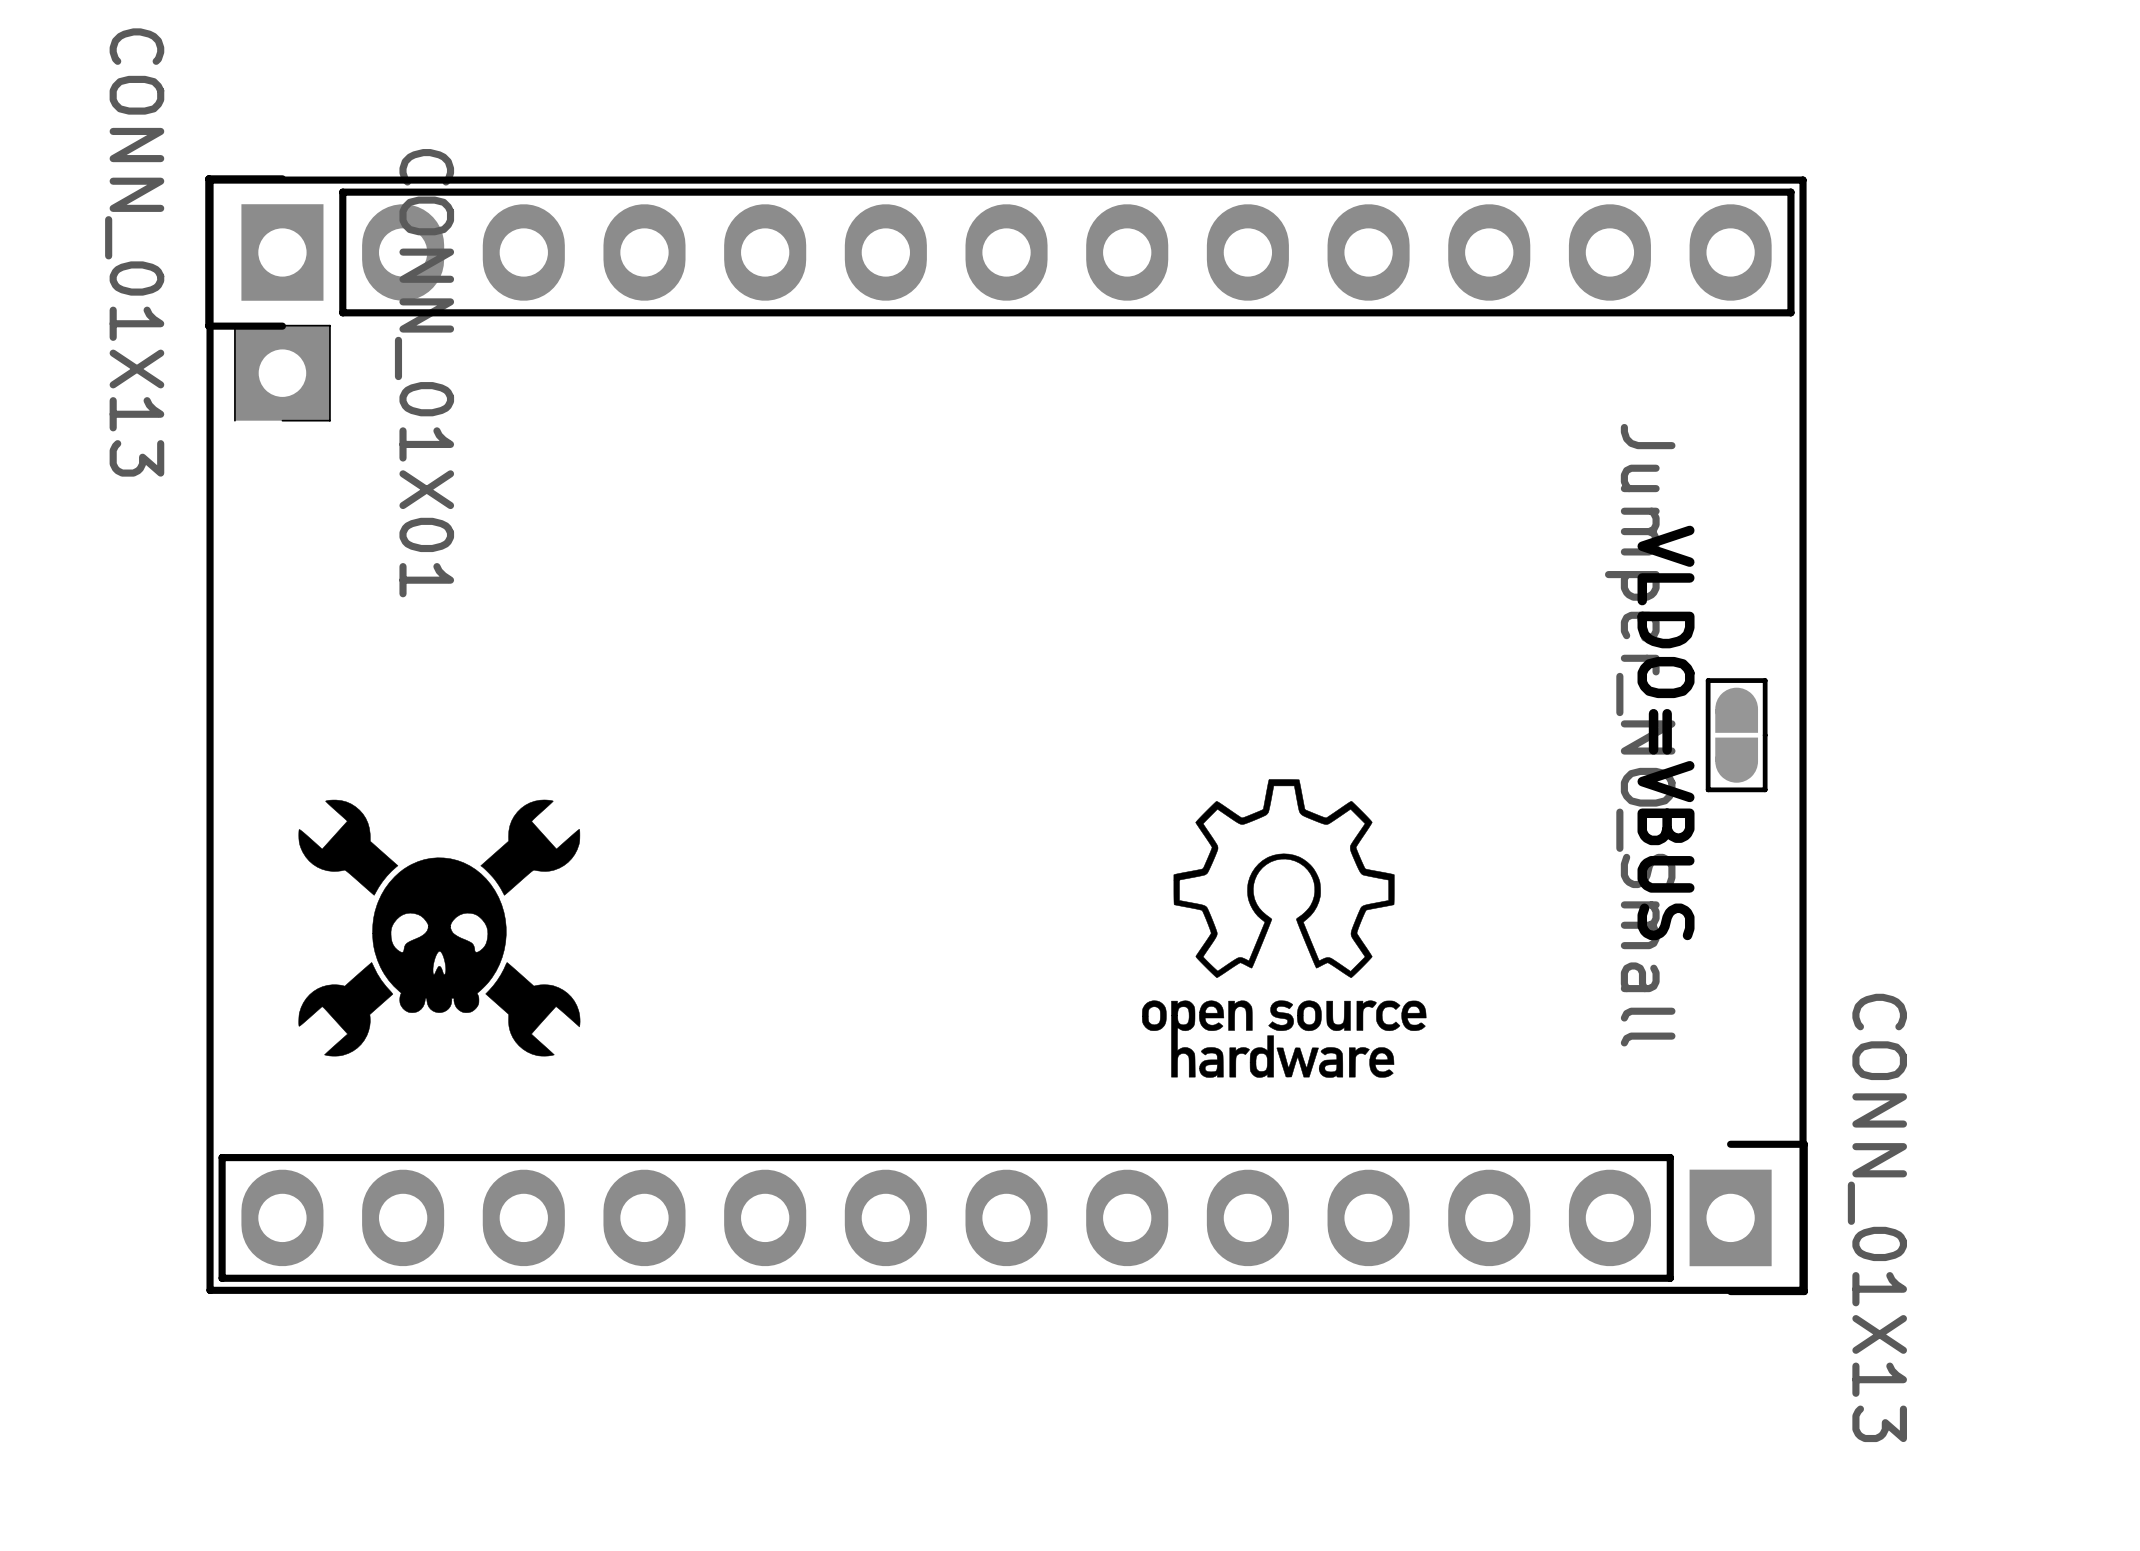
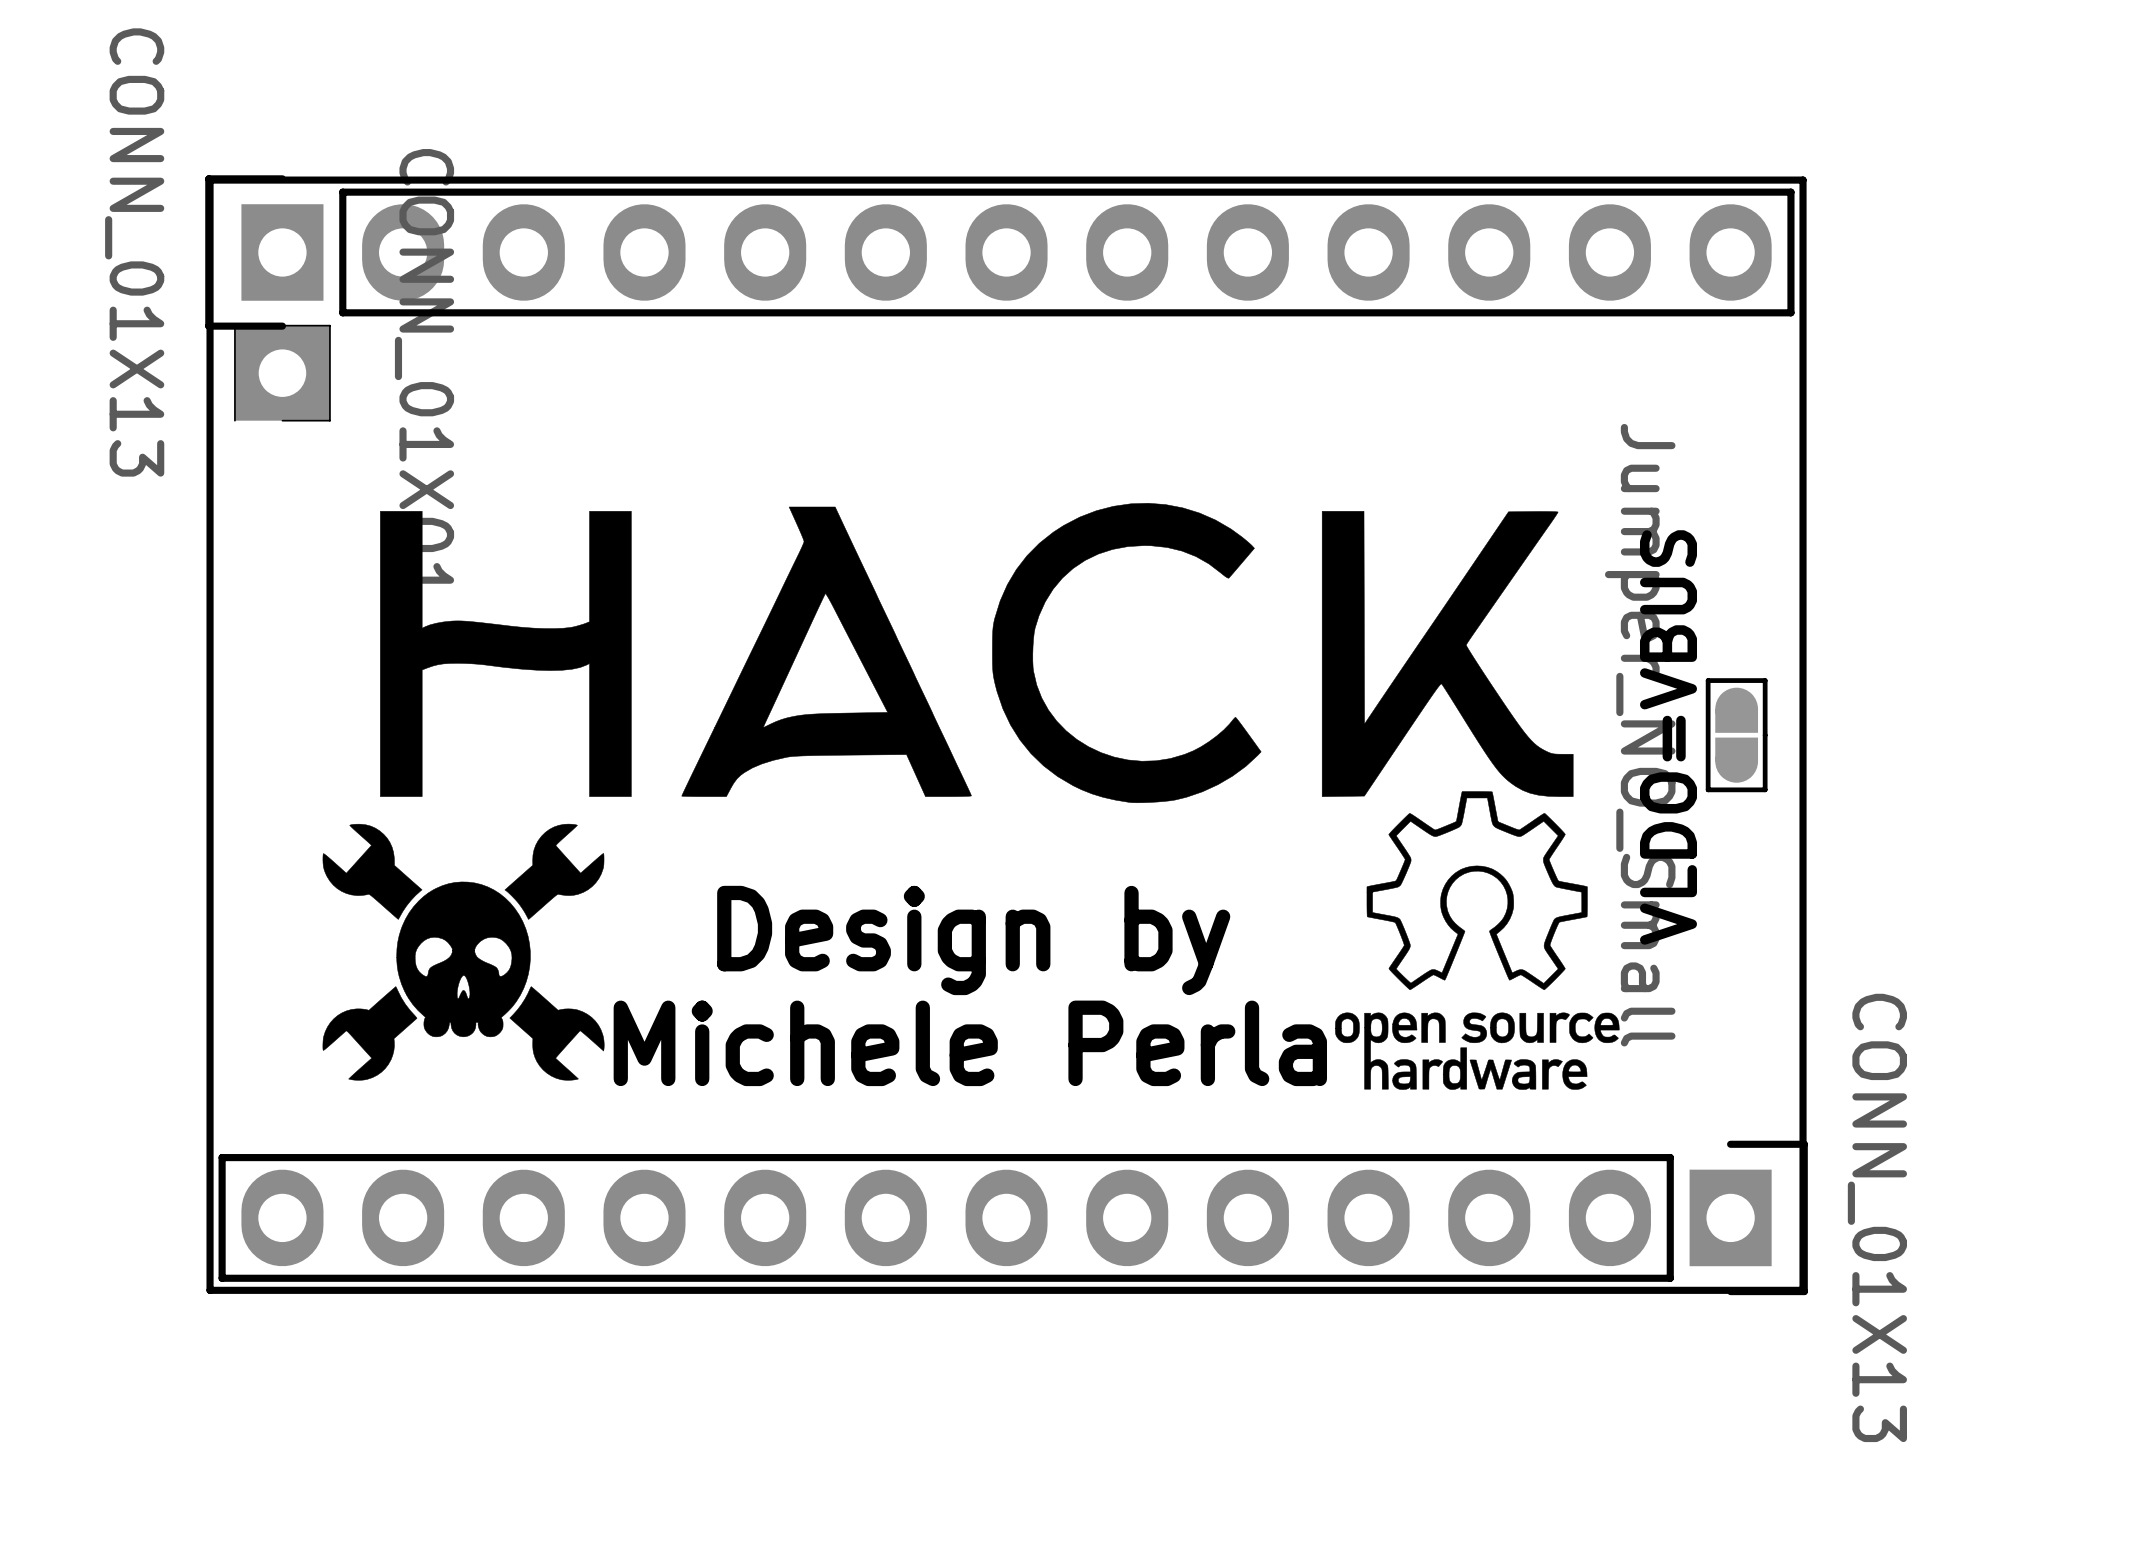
drawing: none -> [380, 503, 1574, 804]
text rotation: 0° (1666, 732) -> 180° (1668, 737)
drawing position: (439, 928) -> (463, 952)
drawing position: (1284, 928) -> (1477, 940)
text: none -> Design by (973, 940)
text: none -> Michele Perla (970, 1043)

